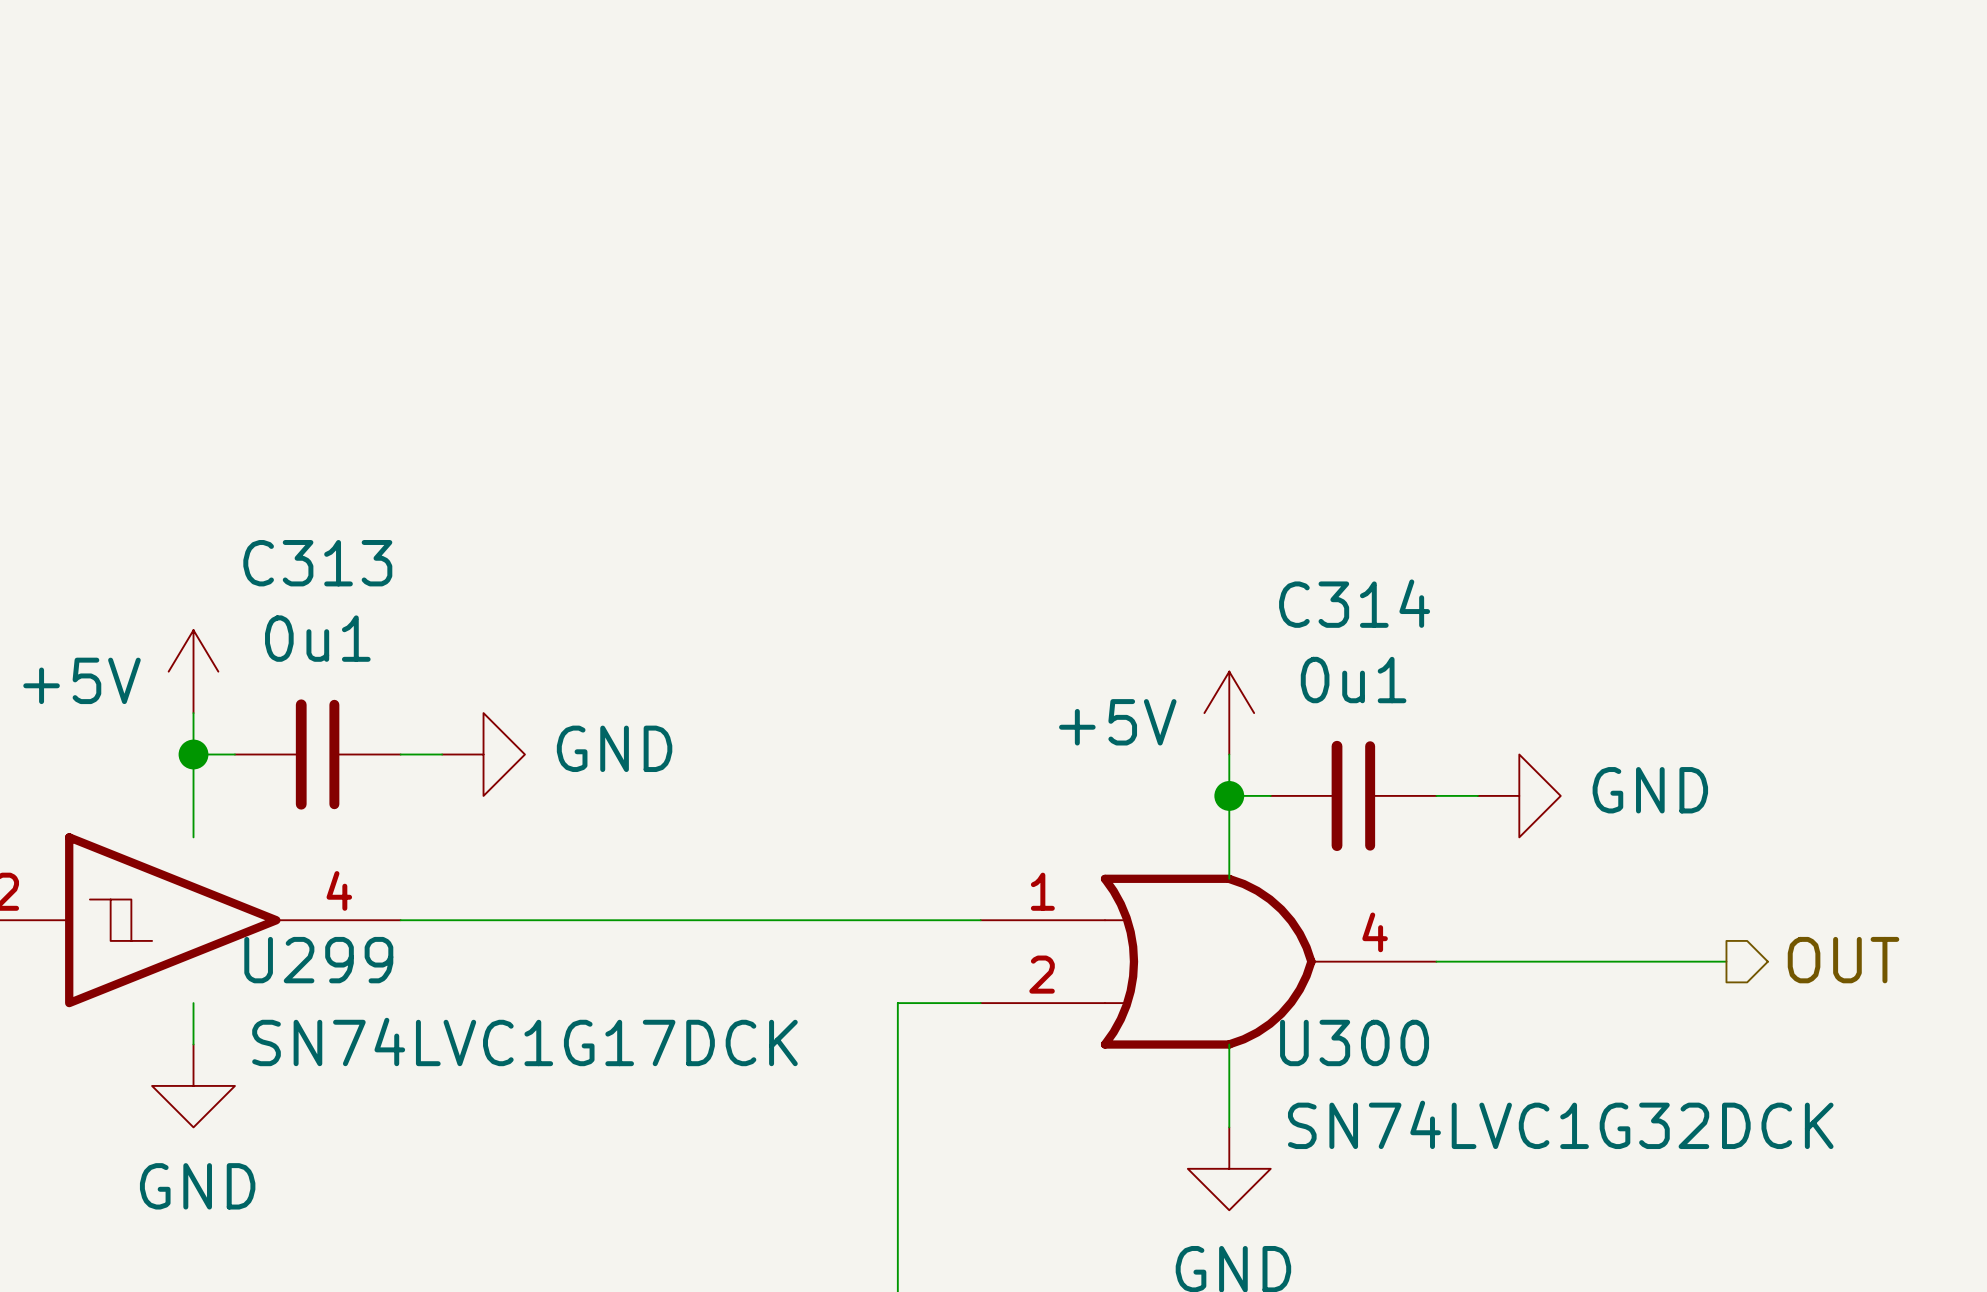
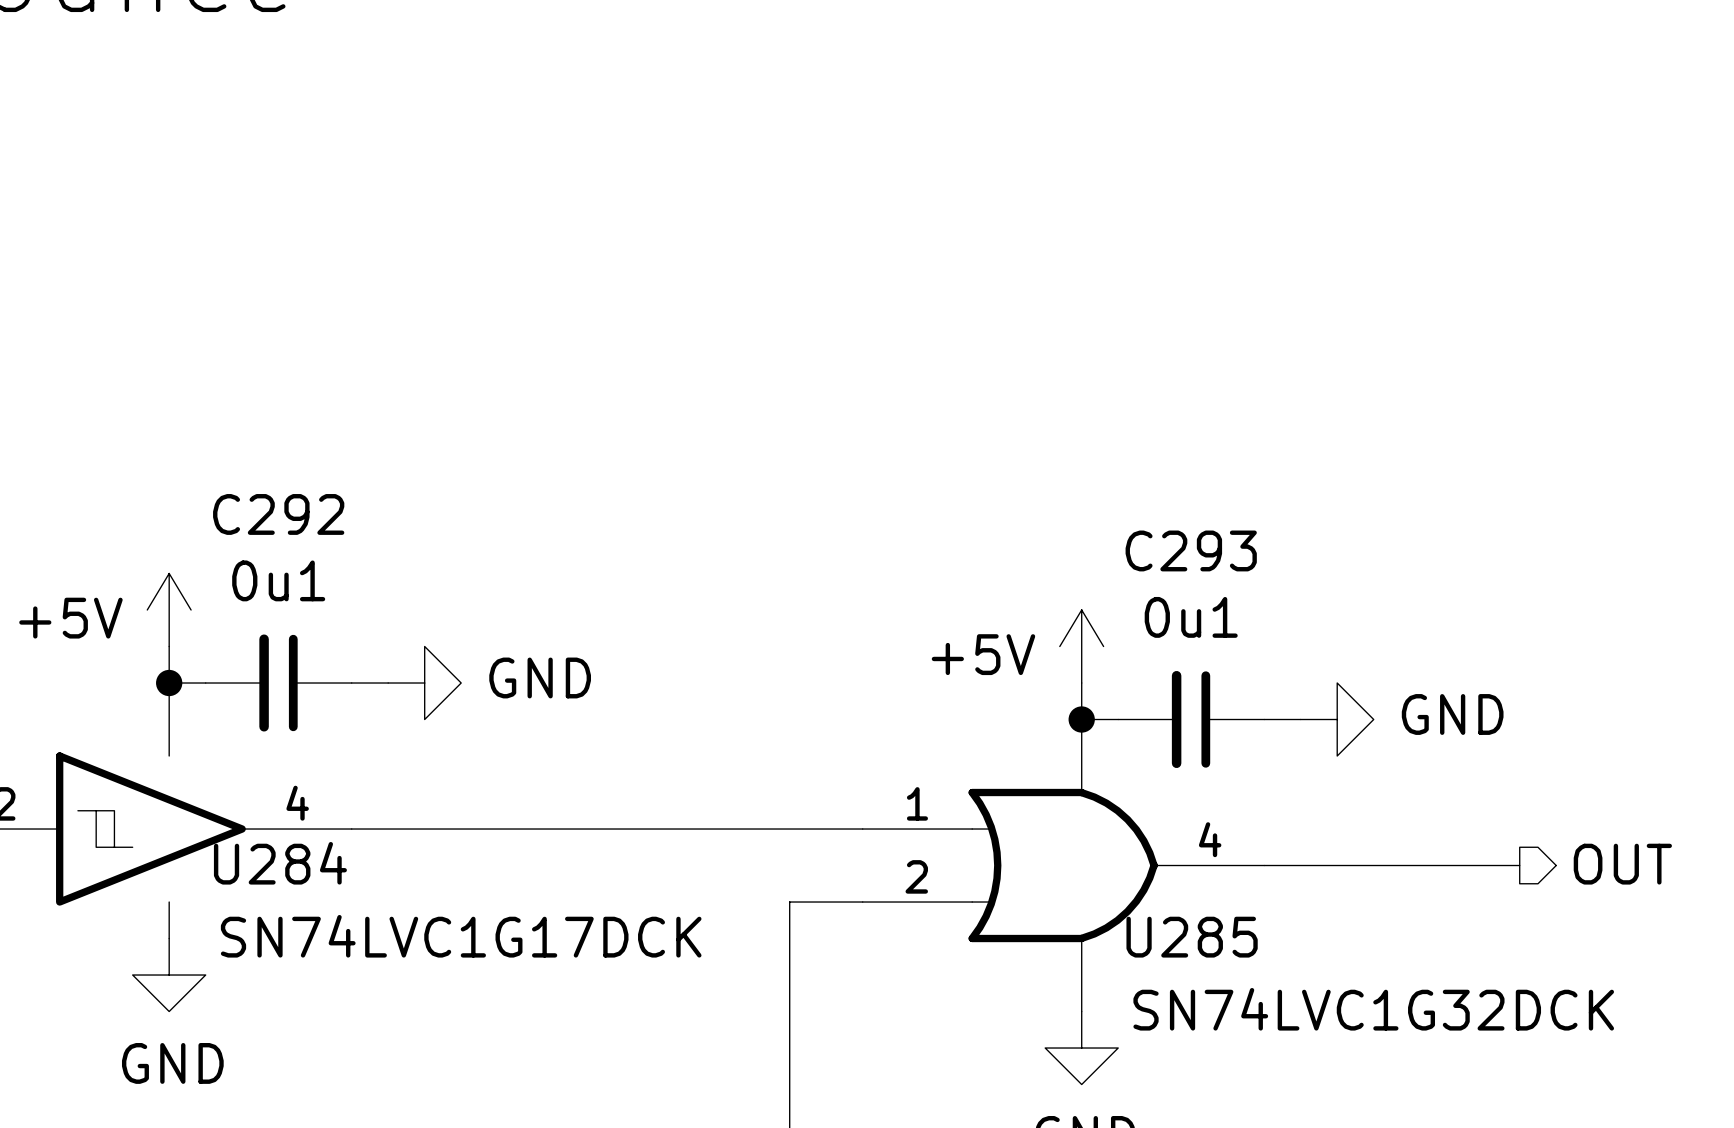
C313 name: C313 (317, 563) -> C292 (278, 514)
C314 name: C314 (1354, 603) -> C293 (1191, 550)
U299 name: U299 (318, 960) -> U284 (280, 863)
U300 name: U300 (1354, 1042) -> U285 (1192, 937)

